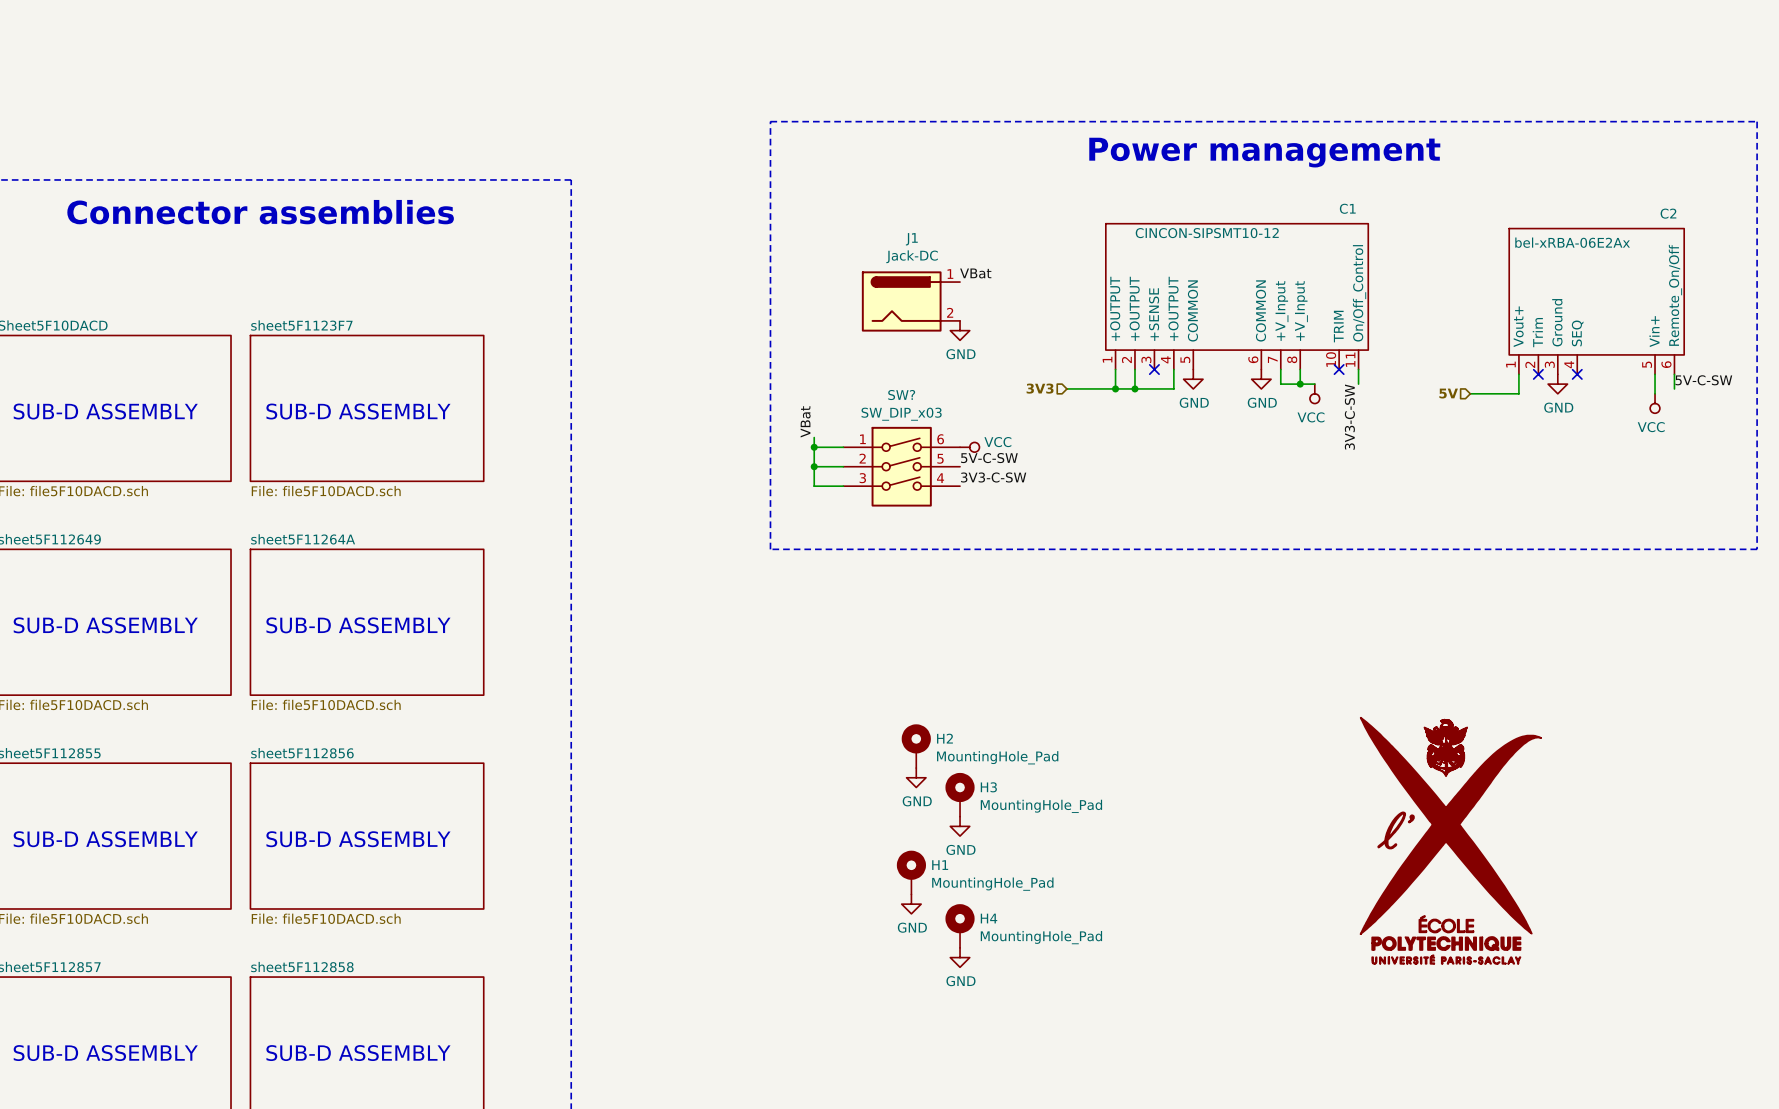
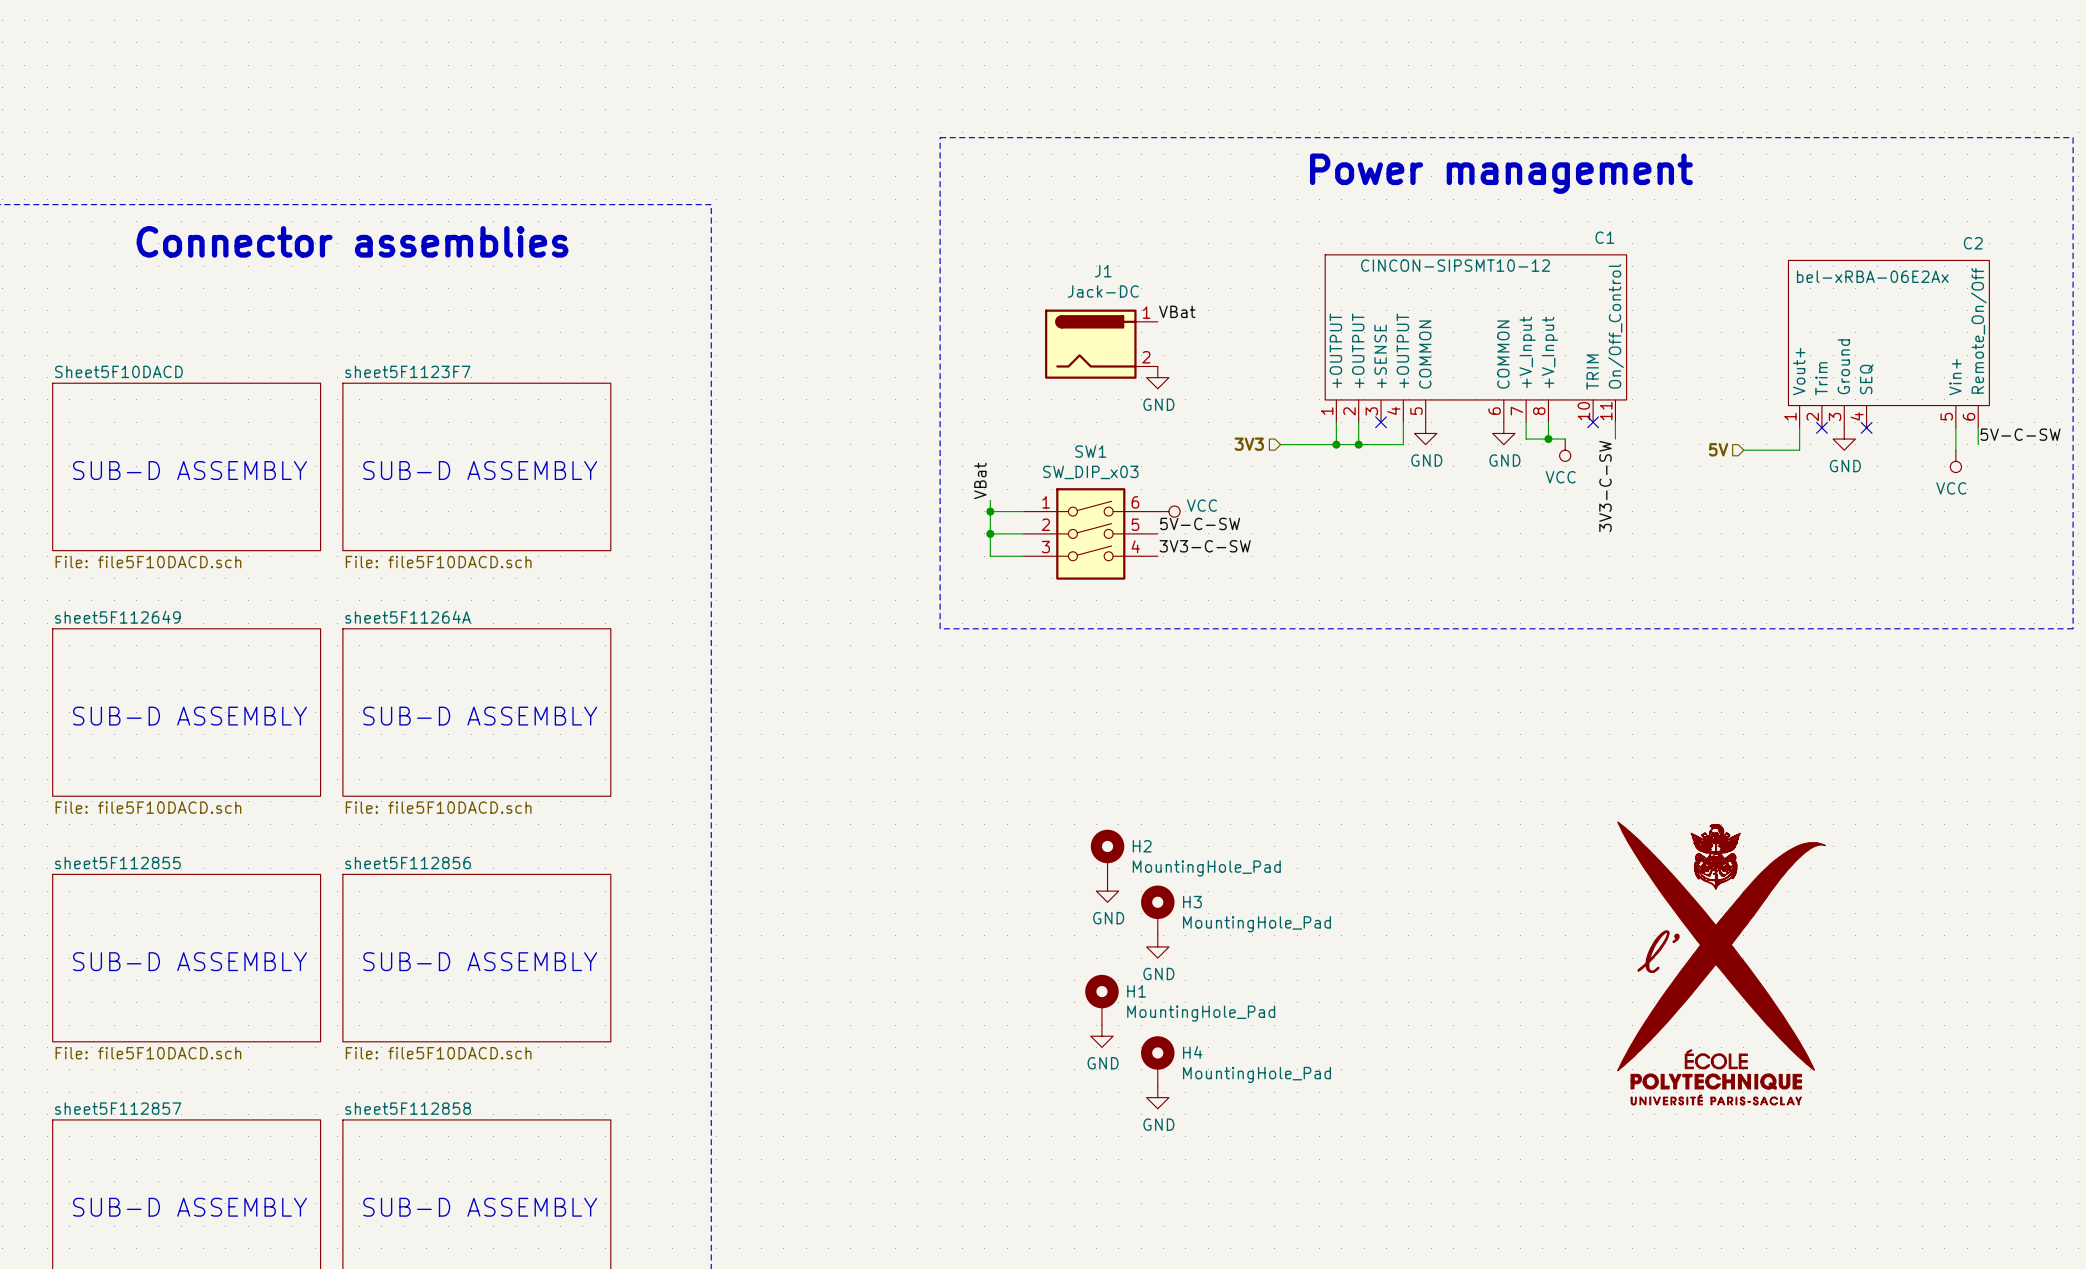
SW? name: SW? (901, 395) -> SW1 (1090, 451)

